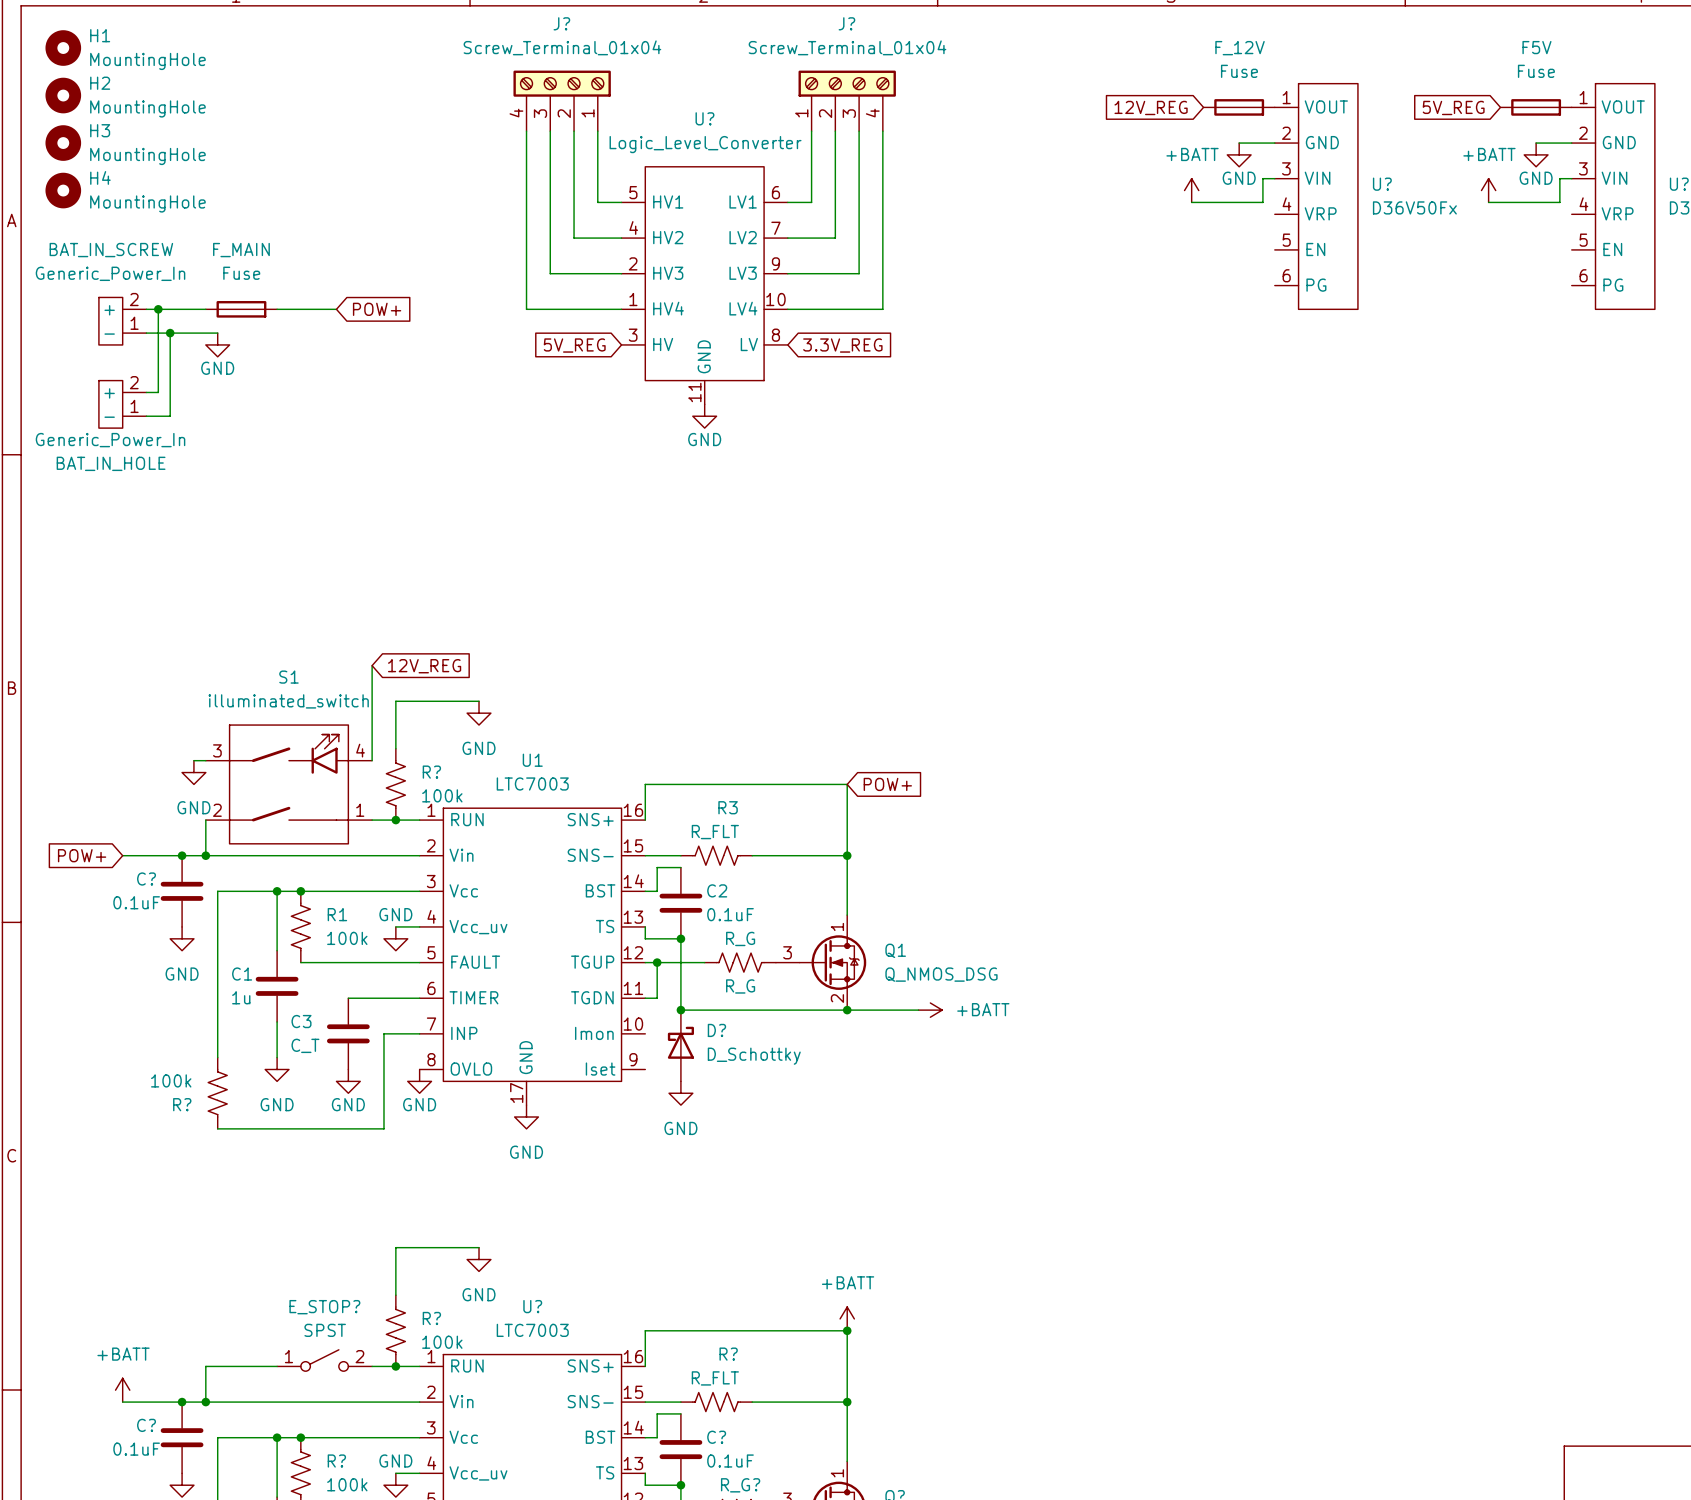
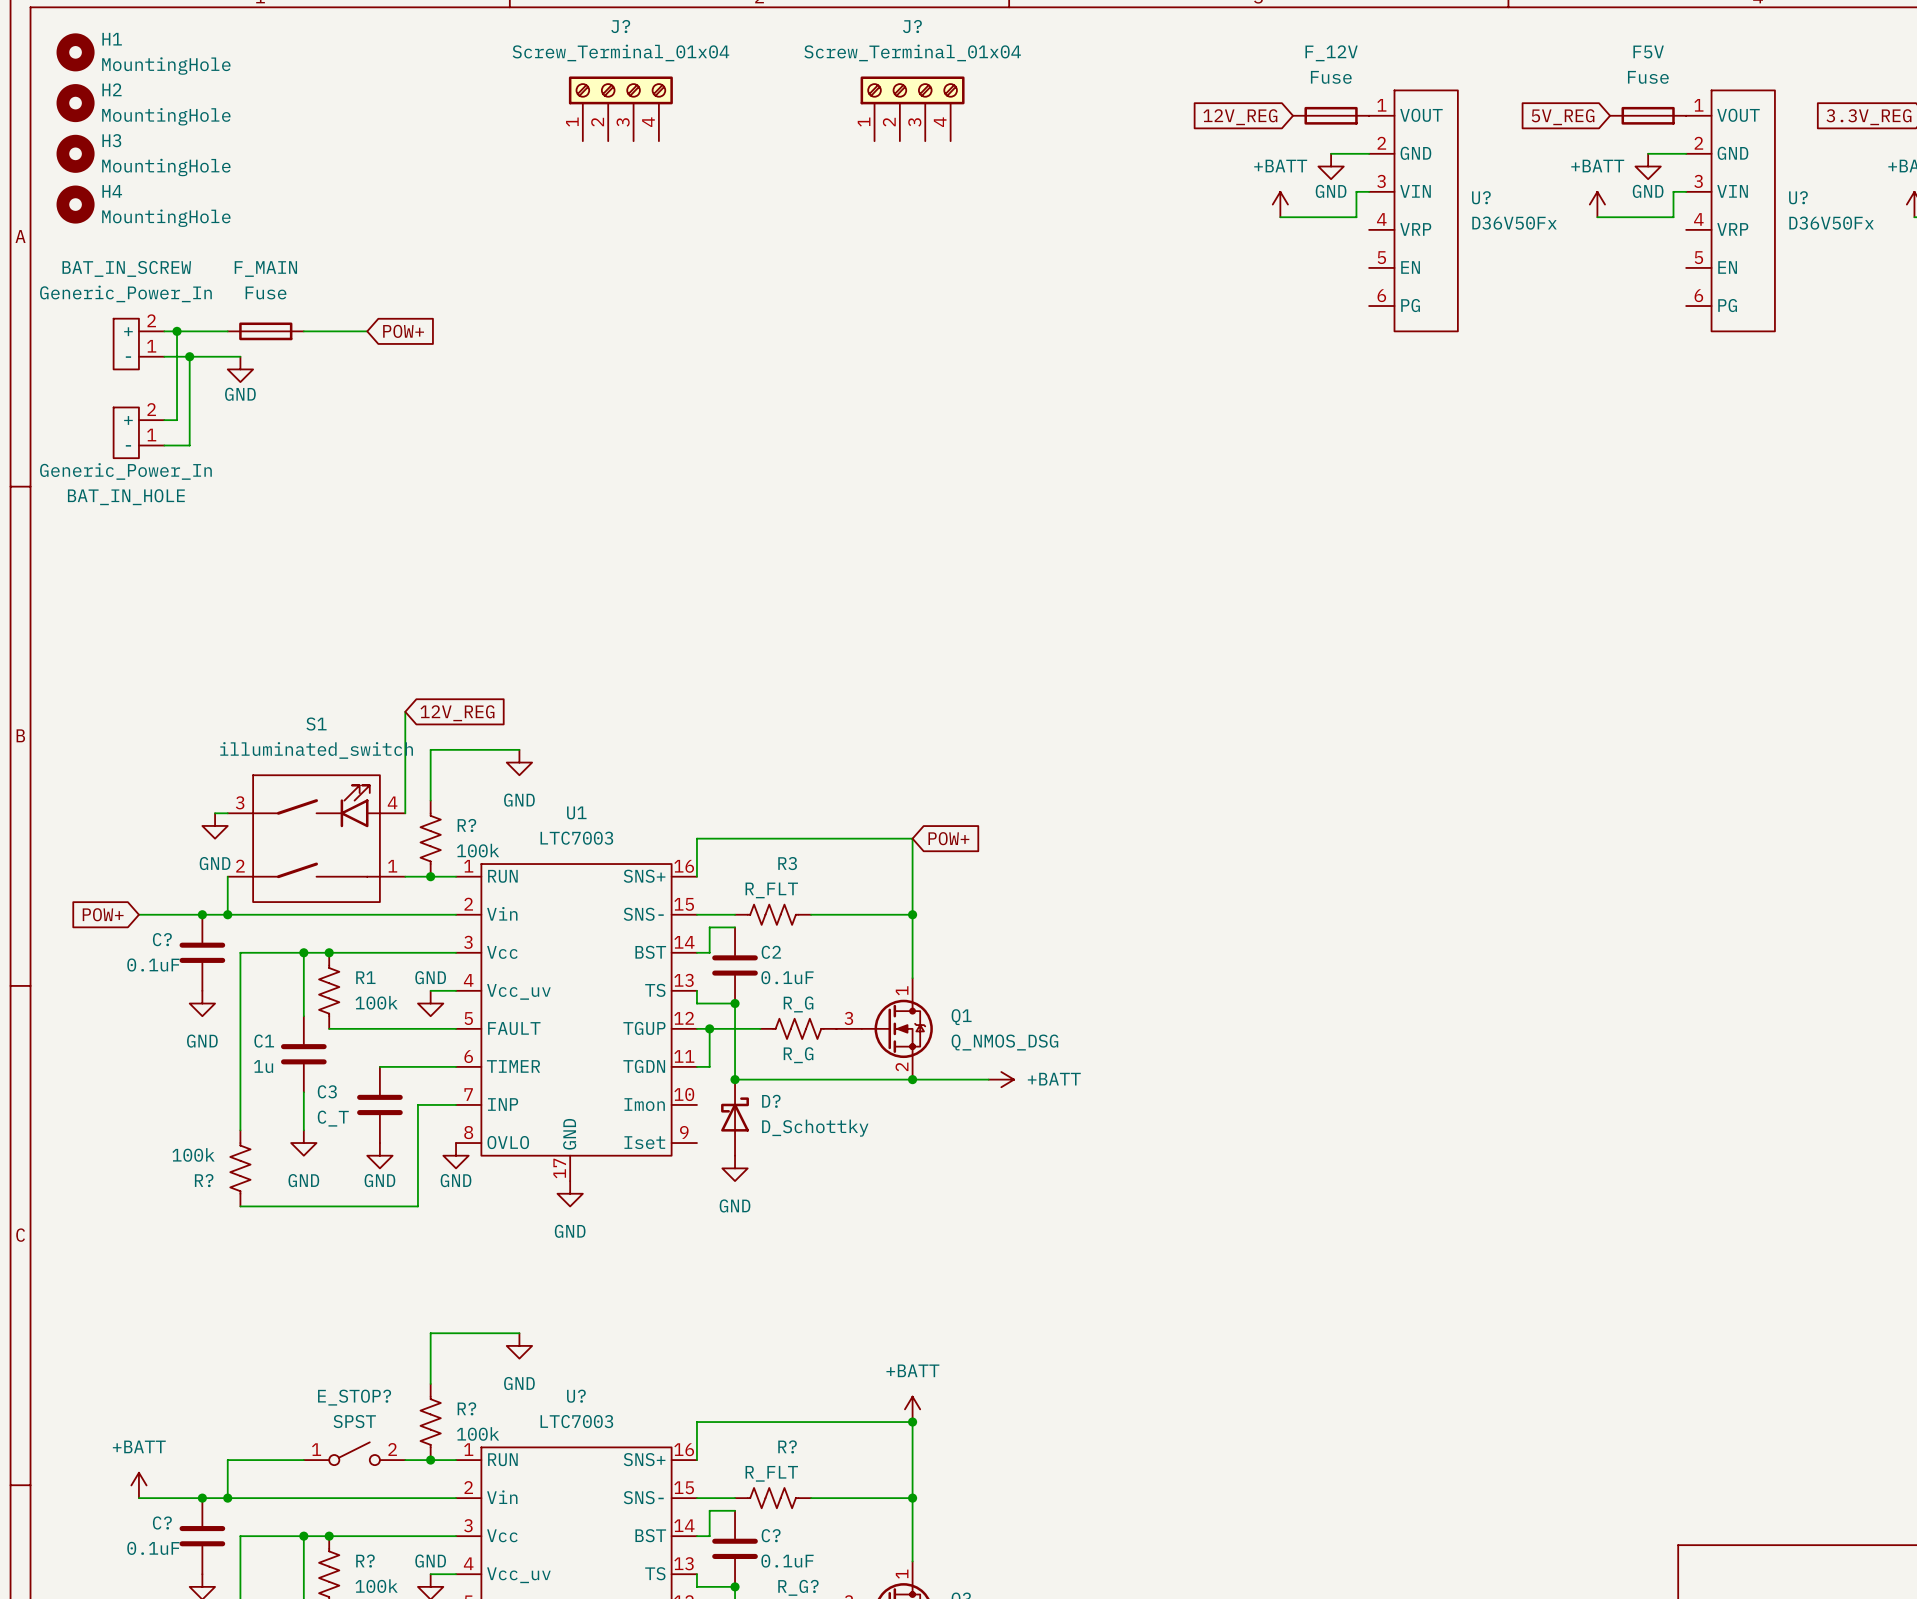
J?: Screw_Terminal_01x04 (562, 100) -> none
J?: none -> Screw_Terminal_01x04 (620, 108)
wire: (526, 131) (526, 309) (621, 309) -> none
wire: (550, 131) (550, 273) (621, 273) -> none
wire: (574, 131) (574, 238) (621, 238) -> none
wire: (597, 131) (597, 202) (621, 202) -> none
wire: (811, 131) (811, 202) (787, 202) -> none
wire: (835, 131) (835, 238) (787, 238) -> none
wire: (859, 131) (859, 273) (787, 273) -> none
wire: (882, 131) (882, 309) (787, 309) -> none
U?: Logic_Level_Converter (704, 285) -> none
global label: 5V_REG (574, 345) -> none
global label: 3.3V_REG (842, 345) -> none
power symbol: GND (704, 416) -> none

